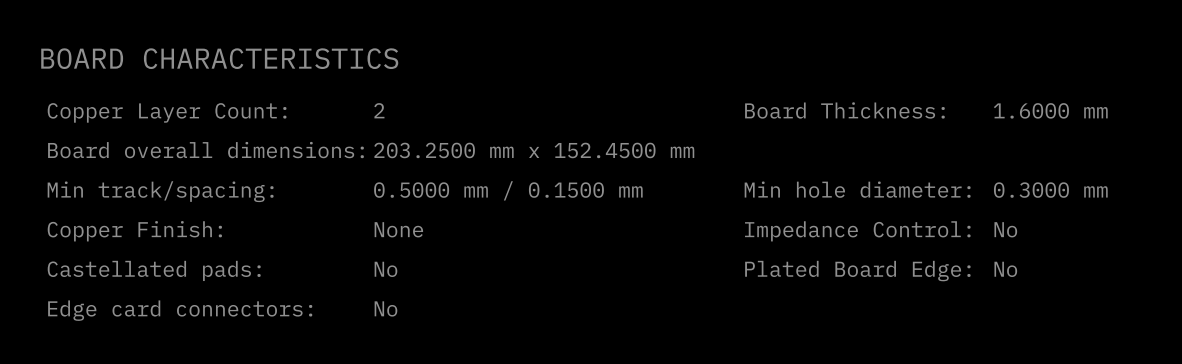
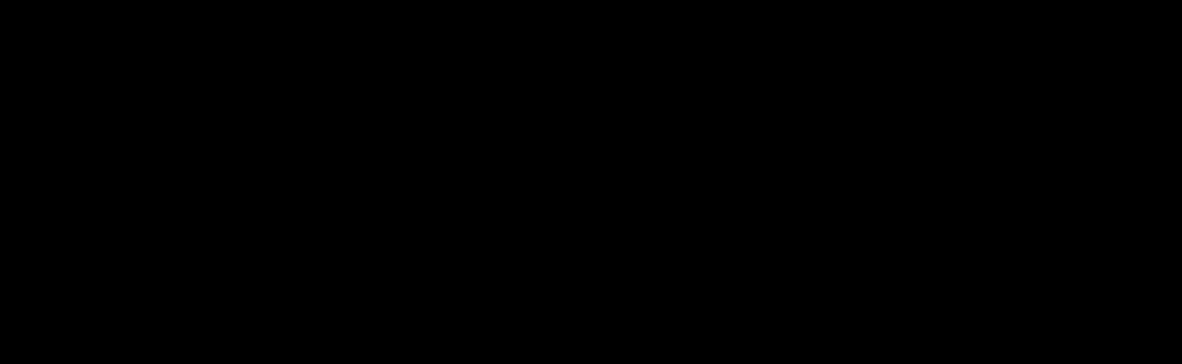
text: BOARD CHARACTERISTICS (219, 58) -> none
text: 2 (379, 110) -> none
text: Board Thickness: (844, 110) -> none
text: 1.6000 mm (1050, 110) -> none
text: Copper Layer Count: (167, 112) -> none
text: Board overall dimensions: (205, 150) -> none
text: 203.2500 mm x 152.4500 mm (534, 150) -> none
text: Min hole diameter: (857, 189) -> none
text: 0.5000 mm / 0.1500 mm (508, 190) -> none
text: 0.3000 mm (1050, 190) -> none
text: Min track/spacing: (160, 191) -> none
text: None (398, 229) -> none
text: No (1005, 229) -> none
text: Copper Finish: (134, 231) -> none
text: Impedance Control: (857, 231) -> none
text: No (385, 269) -> none
text: No (1005, 269) -> none
text: Castellated pads: (154, 270) -> none
text: Plated Board Edge: (857, 271) -> none
text: No (385, 308) -> none
text: Edge card connectors: (180, 310) -> none

